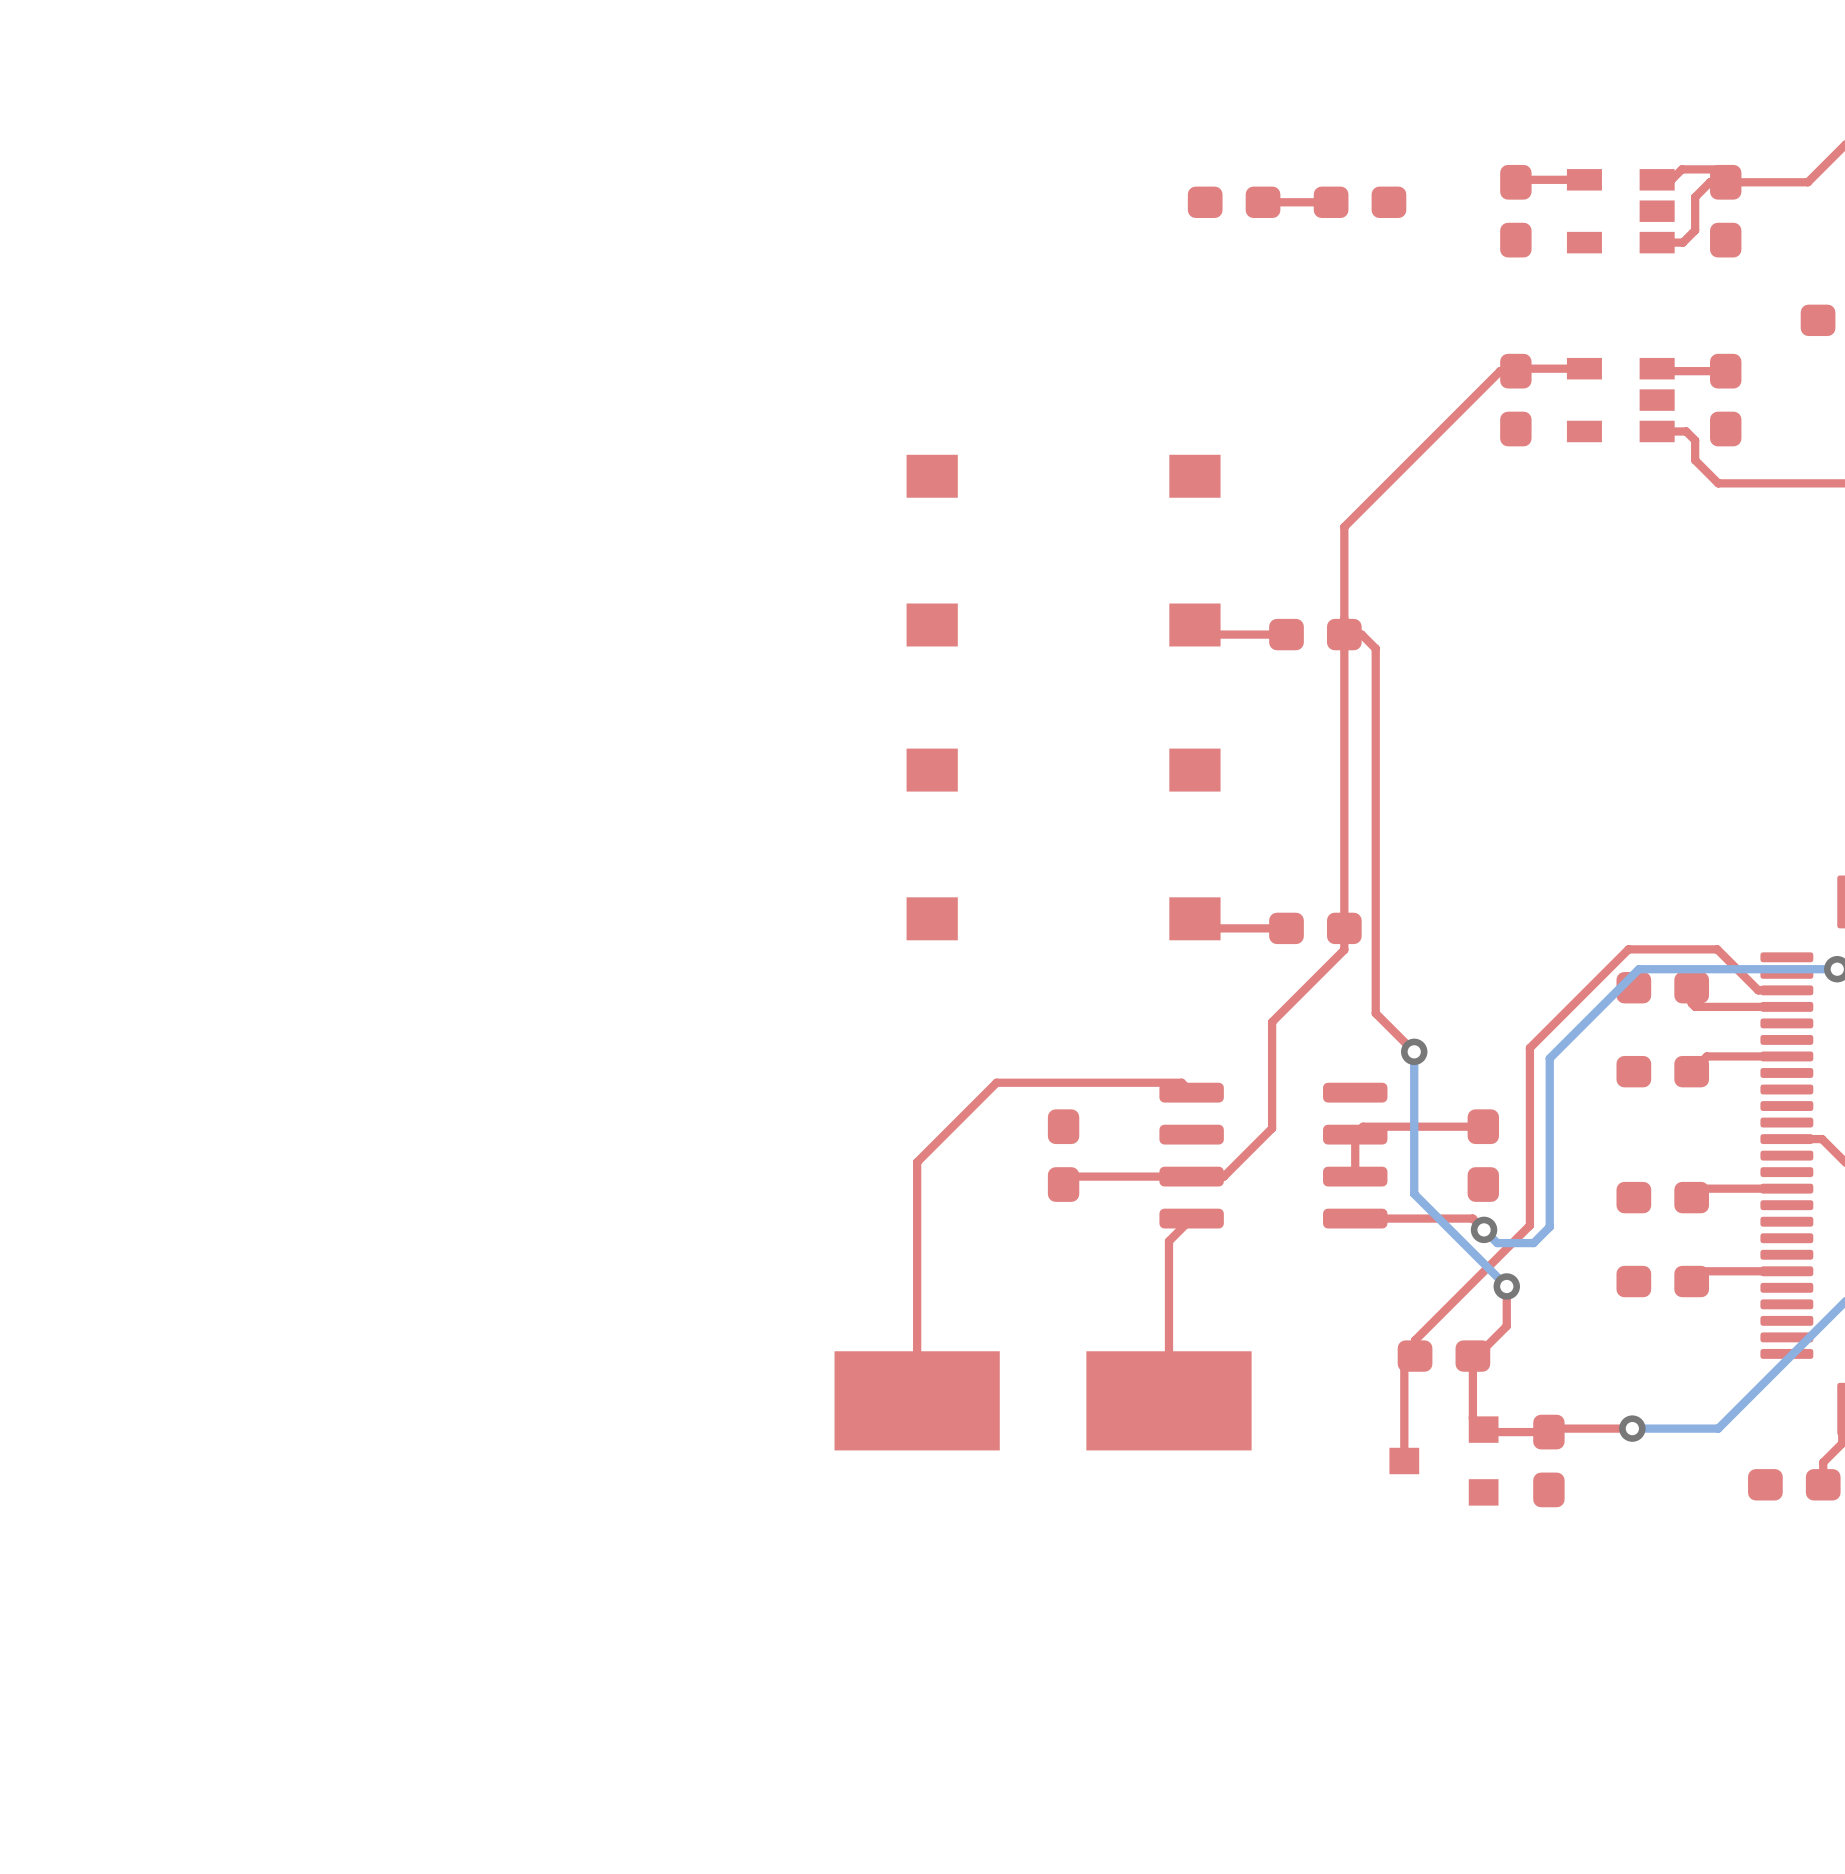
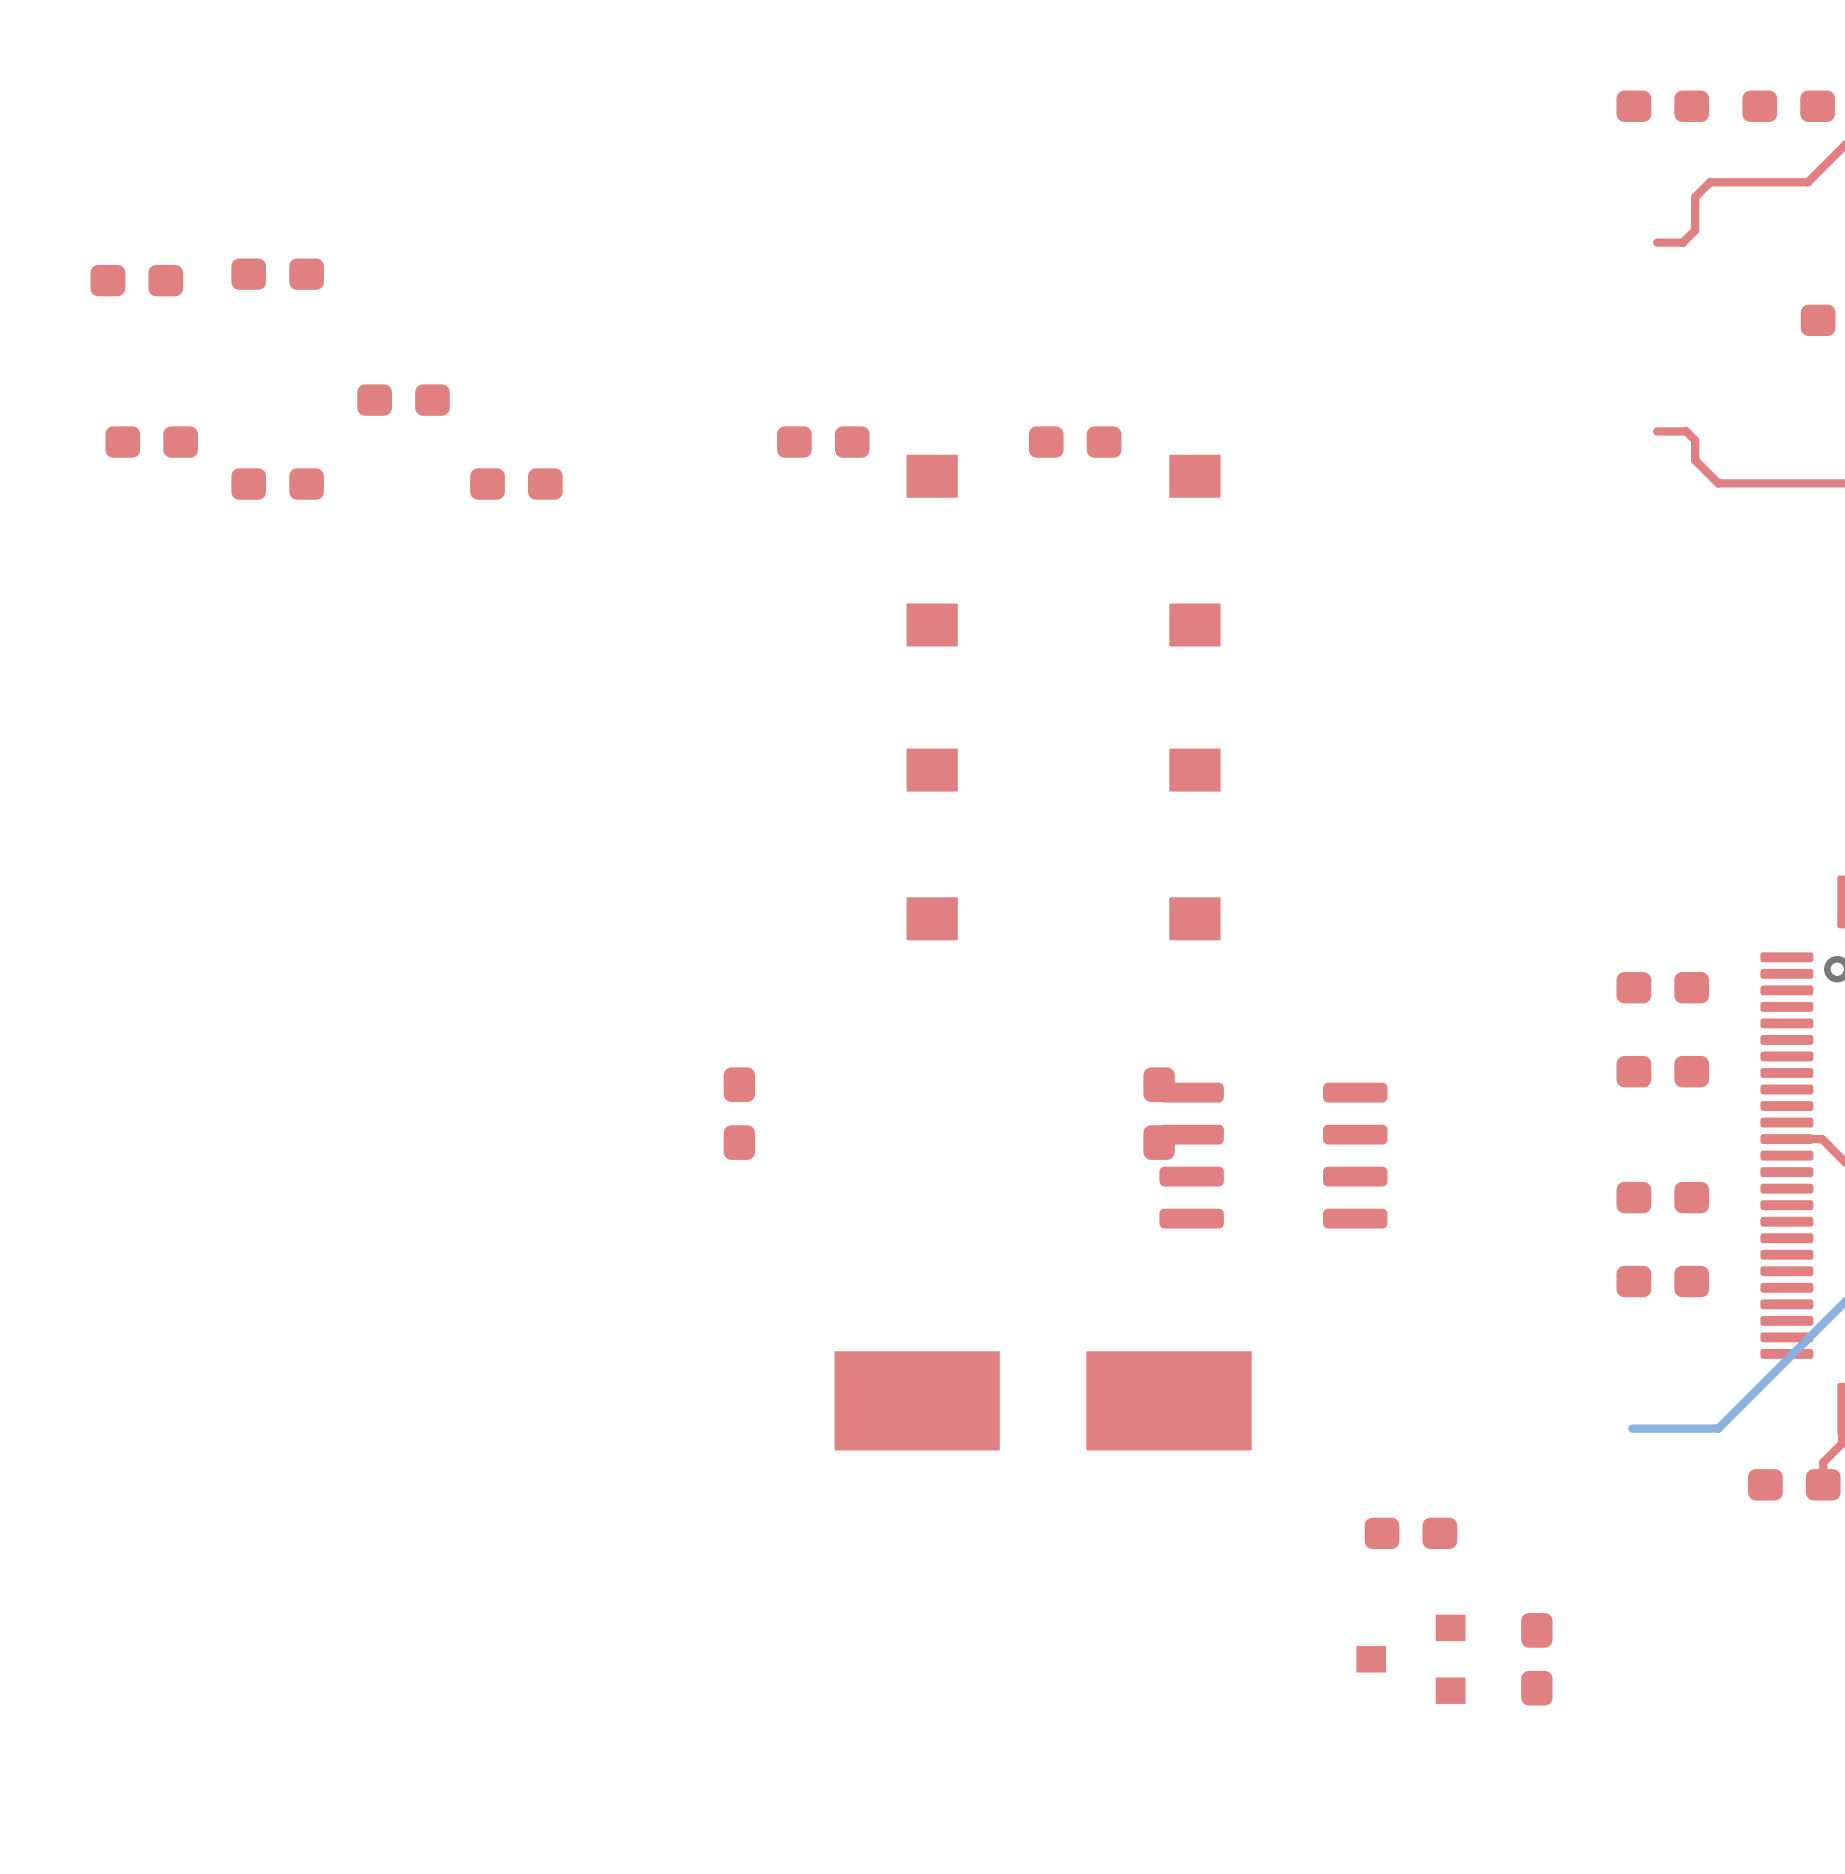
part: none -> (1662, 106)
part: none -> (1788, 106)
top track: (1584, 179) (1518, 179) (1515, 182) -> none
top track: (1725, 182) (1725, 176) (1718, 169) (1681, 169) (1671, 179) (1657, 179) (1659, 182) -> none
part: (1234, 202) -> none
top track: (1331, 202) (1263, 202) -> none
part: (1360, 202) -> none
part: (1515, 211) -> none
part: (1620, 211) -> none
part: (1725, 211) -> none
part: none -> (277, 274)
part: none -> (136, 280)
top track: (1584, 368) (1518, 368) (1515, 371) (1500, 371) (1344, 527) (1344, 949) (1272, 1022) (1272, 1128) (1223, 1176) (1071, 1176) (1063, 1184) -> none
top track: (1657, 368) (1659, 371) (1725, 371) -> none
part: none -> (403, 400)
part: (1515, 400) -> none
part: (1620, 400) -> none
part: (1725, 400) -> none
part: none -> (151, 442)
part: none -> (823, 442)
part: none -> (1075, 442)
part: none -> (277, 484)
part: none -> (516, 484)
top track: (1194, 624) (1204, 634) (1286, 634) -> none
part: (1315, 634) -> none
top track: (1344, 634) (1361, 634) (1375, 648) (1375, 1013) (1414, 1051) -> none
top track: (1194, 918) (1204, 928) (1286, 928) -> none
part: (1315, 928) -> none
bottom track: (1837, 969) (1638, 969) (1549, 1058) (1549, 1227) (1533, 1243) (1497, 1243) (1484, 1229) -> none
top track: (1691, 987) (1691, 1003) (1695, 1006) (1786, 1006) -> none
top track: (1786, 990) (1758, 990) (1717, 949) (1628, 949) (1529, 1048) (1529, 1225) (1415, 1340) (1415, 1356) (1404, 1366) (1404, 1460) -> none
bottom track: (1414, 1051) (1414, 1193) (1506, 1286) -> none
via: (1414, 1051) -> none
top track: (1786, 1056) (1706, 1056) (1691, 1071) -> none
top track: (1191, 1092) (1181, 1082) (996, 1082) (917, 1162) (917, 1400) -> none
part: none -> (739, 1113)
top track: (1483, 1126) (1363, 1126) (1355, 1134) (1355, 1176) -> none
part position: (1063, 1155) -> (1159, 1113)
part: (1483, 1155) -> none
top track: (1786, 1188) (1700, 1188) (1691, 1197) -> none
top track: (1191, 1218) (1168, 1241) (1168, 1400) -> none
top track: (1355, 1218) (1472, 1218) (1484, 1229) -> none
via: (1484, 1229) -> none
top track: (1786, 1271) (1701, 1271) (1691, 1281) -> none
top track: (1506, 1286) (1506, 1326) (1476, 1356) (1472, 1356) (1472, 1418) (1486, 1432) (1548, 1432) (1552, 1428) (1632, 1428) -> none
via: (1506, 1286) -> none
part: (1443, 1356) -> none
via: (1632, 1428) -> none
part position: (1443, 1460) -> (1410, 1659)
part: (1548, 1460) -> none
part: none -> (1410, 1533)
part: none -> (1536, 1659)

